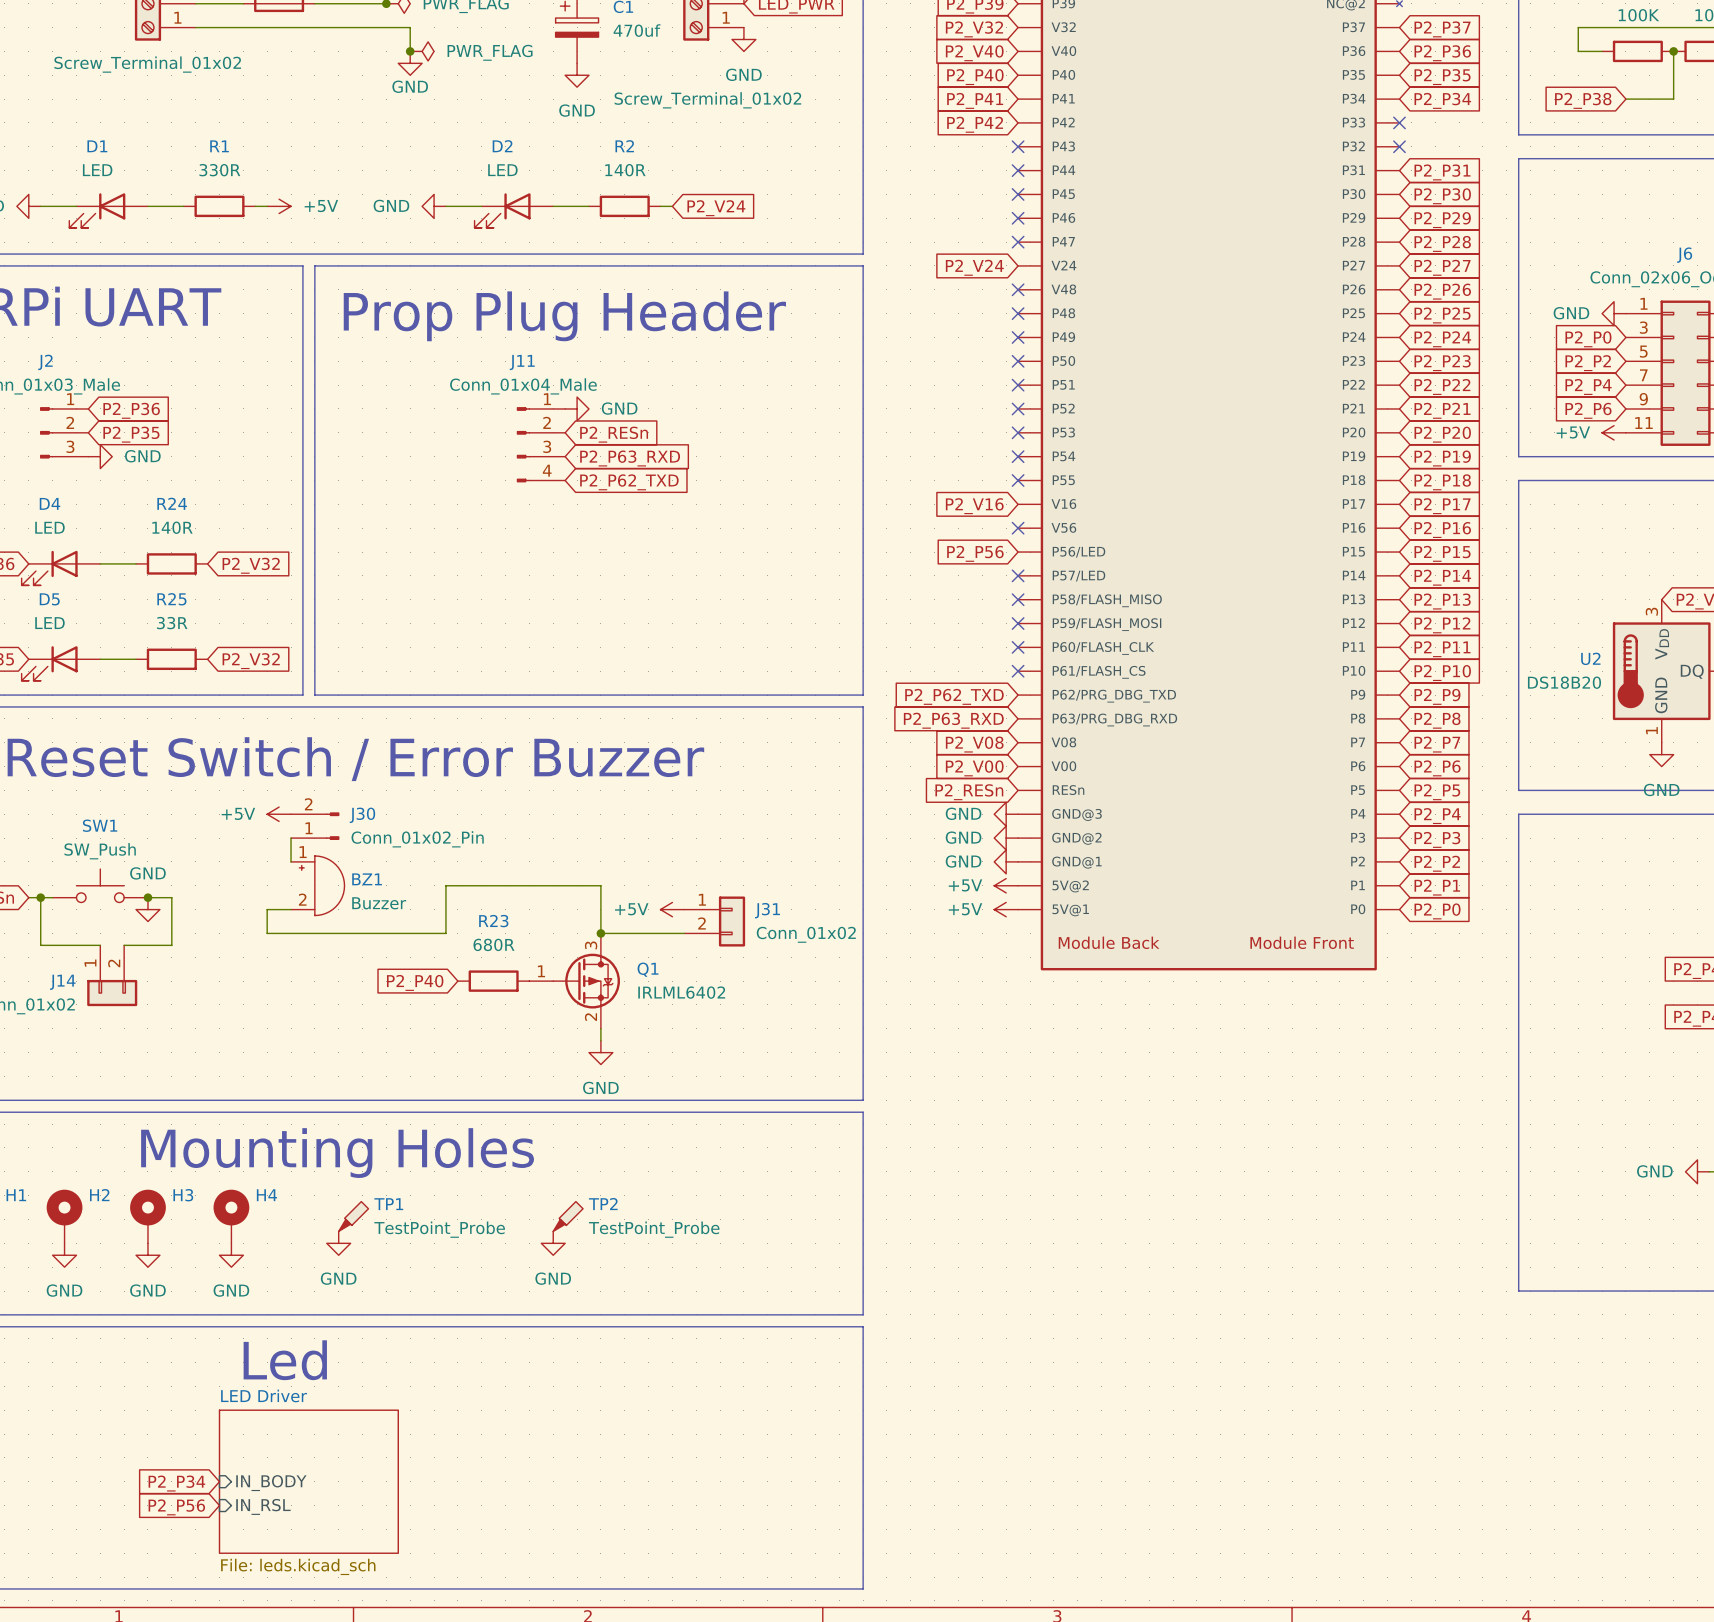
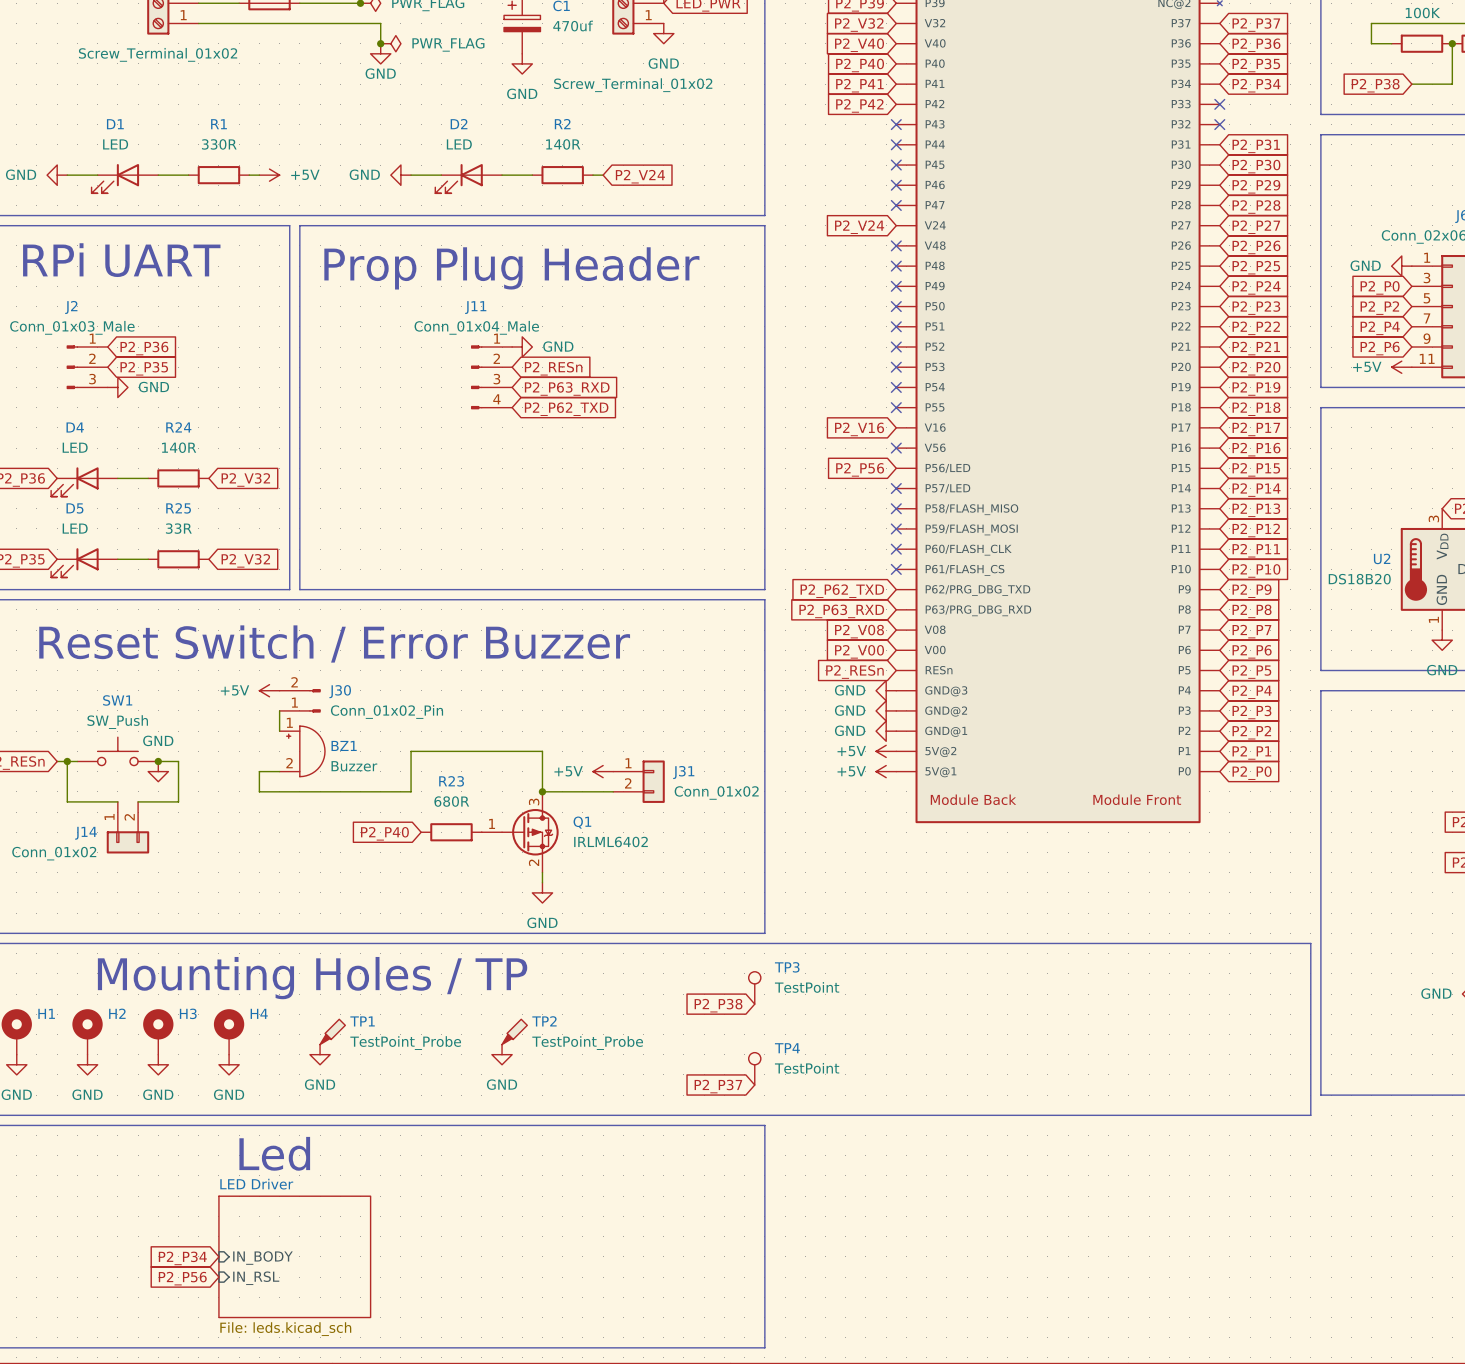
line: (863, 1112) (863, 1314) -> (764, 943) (1310, 943) (1310, 1115) (764, 1115)
text: Mounting Holes (337, 1153) -> Mounting Holes / TP (312, 978)
TP3: none -> TestPoint (754, 987)
global label: none -> P2_P38 (718, 1005)
TP4: none -> TestPoint (754, 1068)
global label: none -> P2_P37 (718, 1086)

